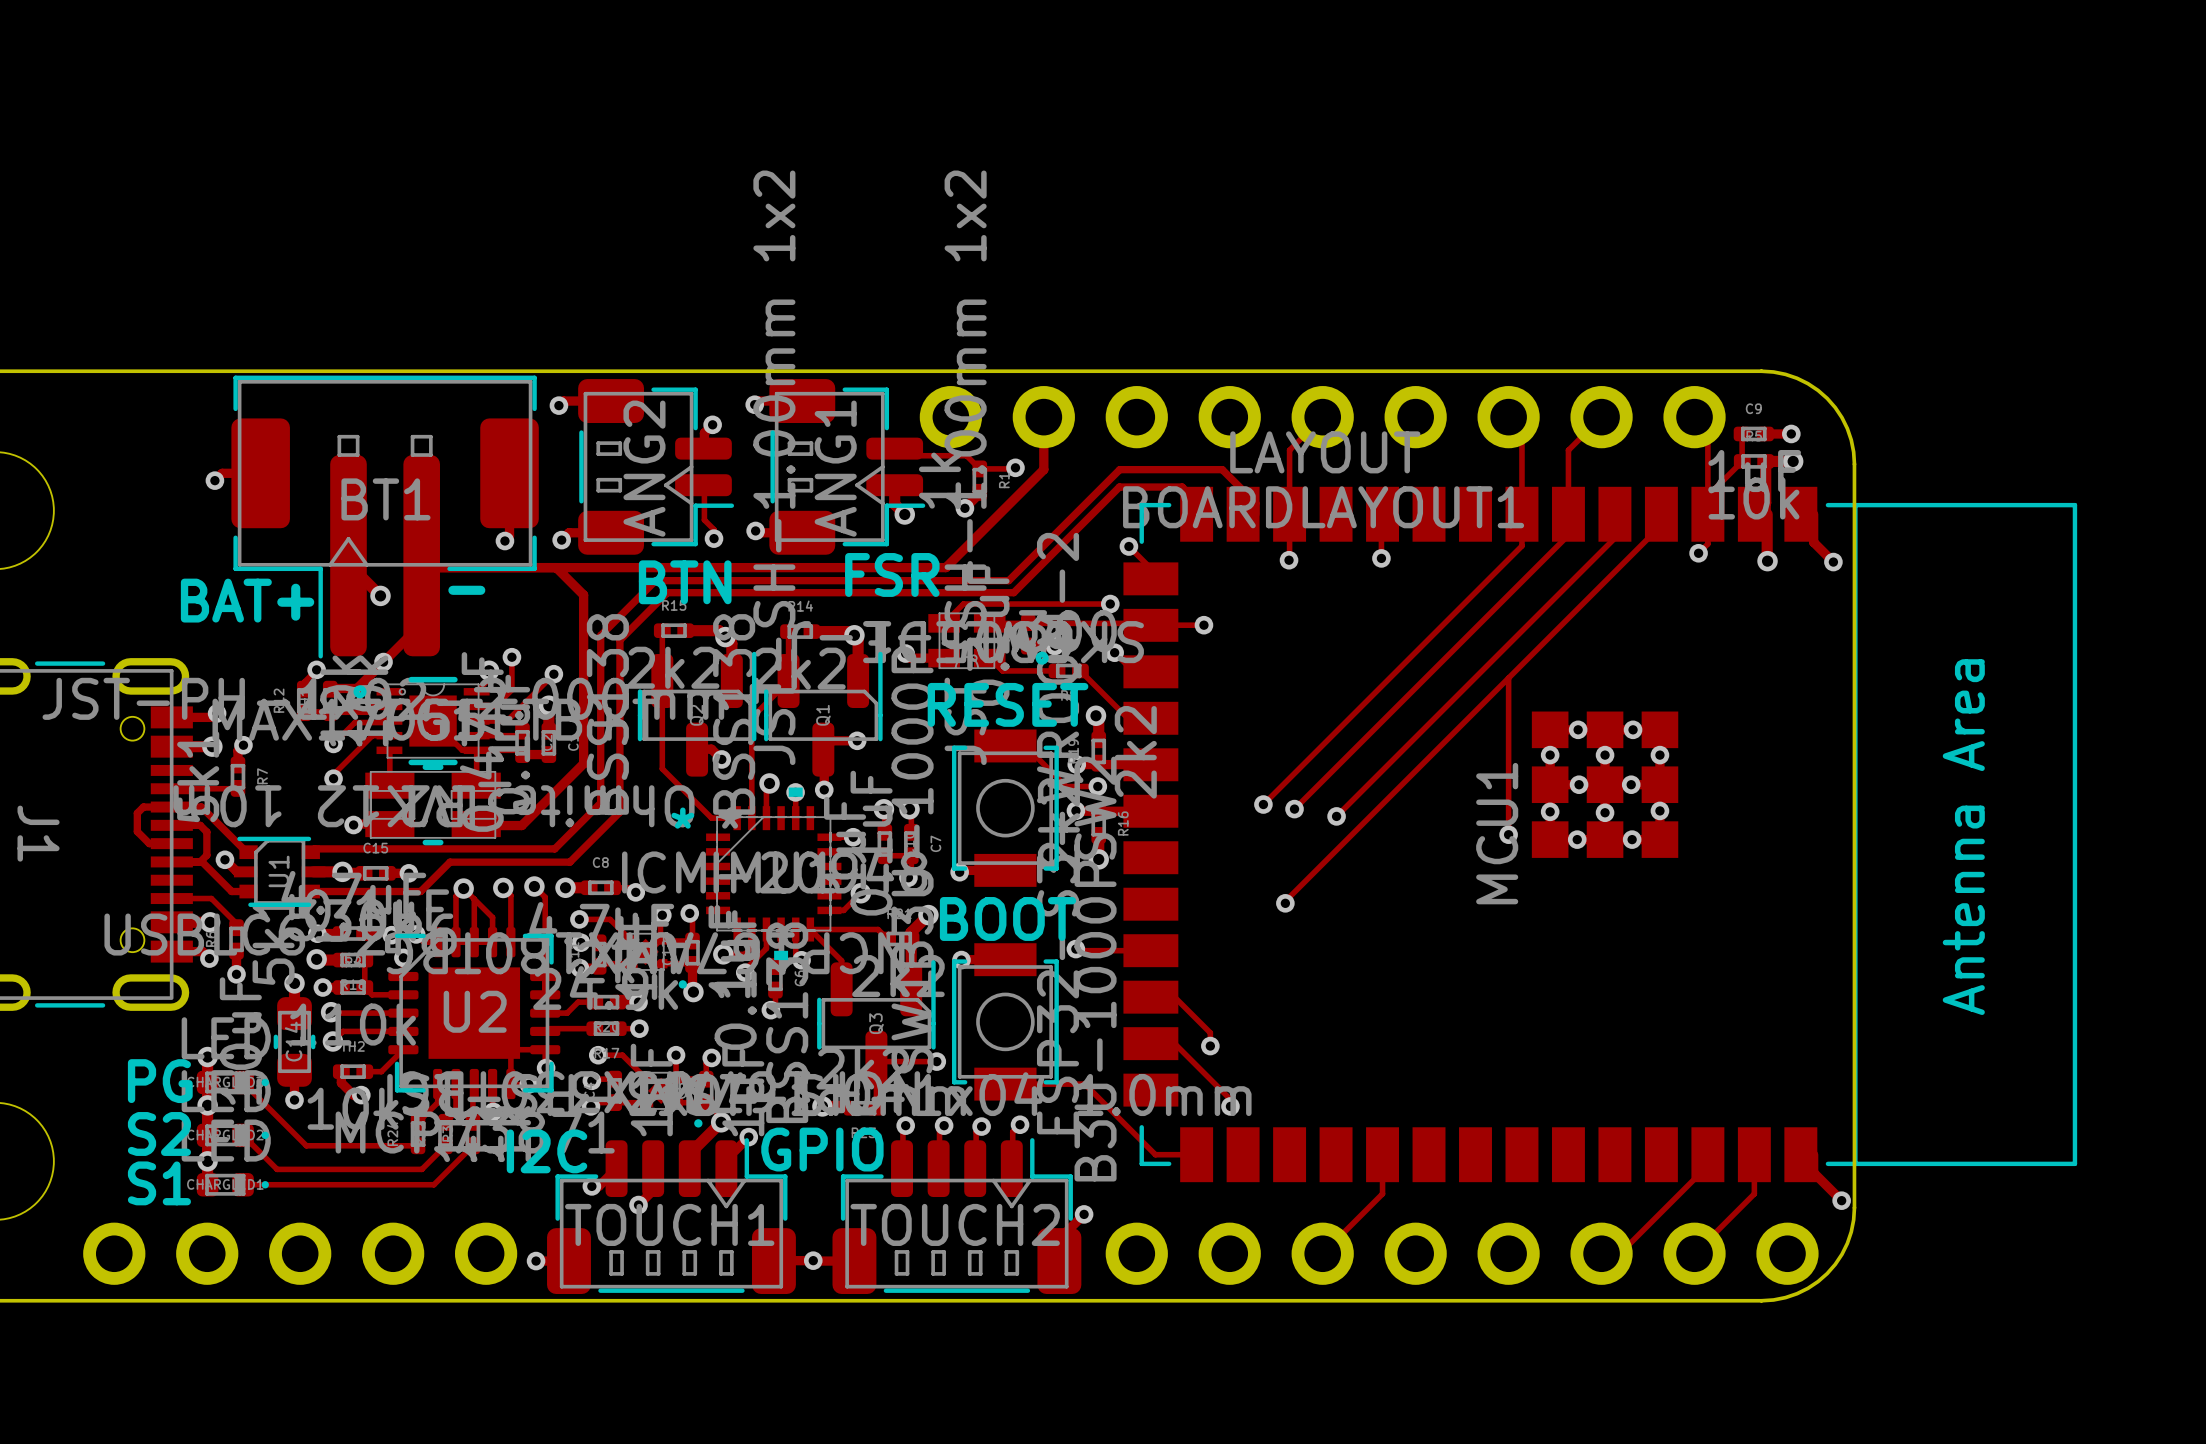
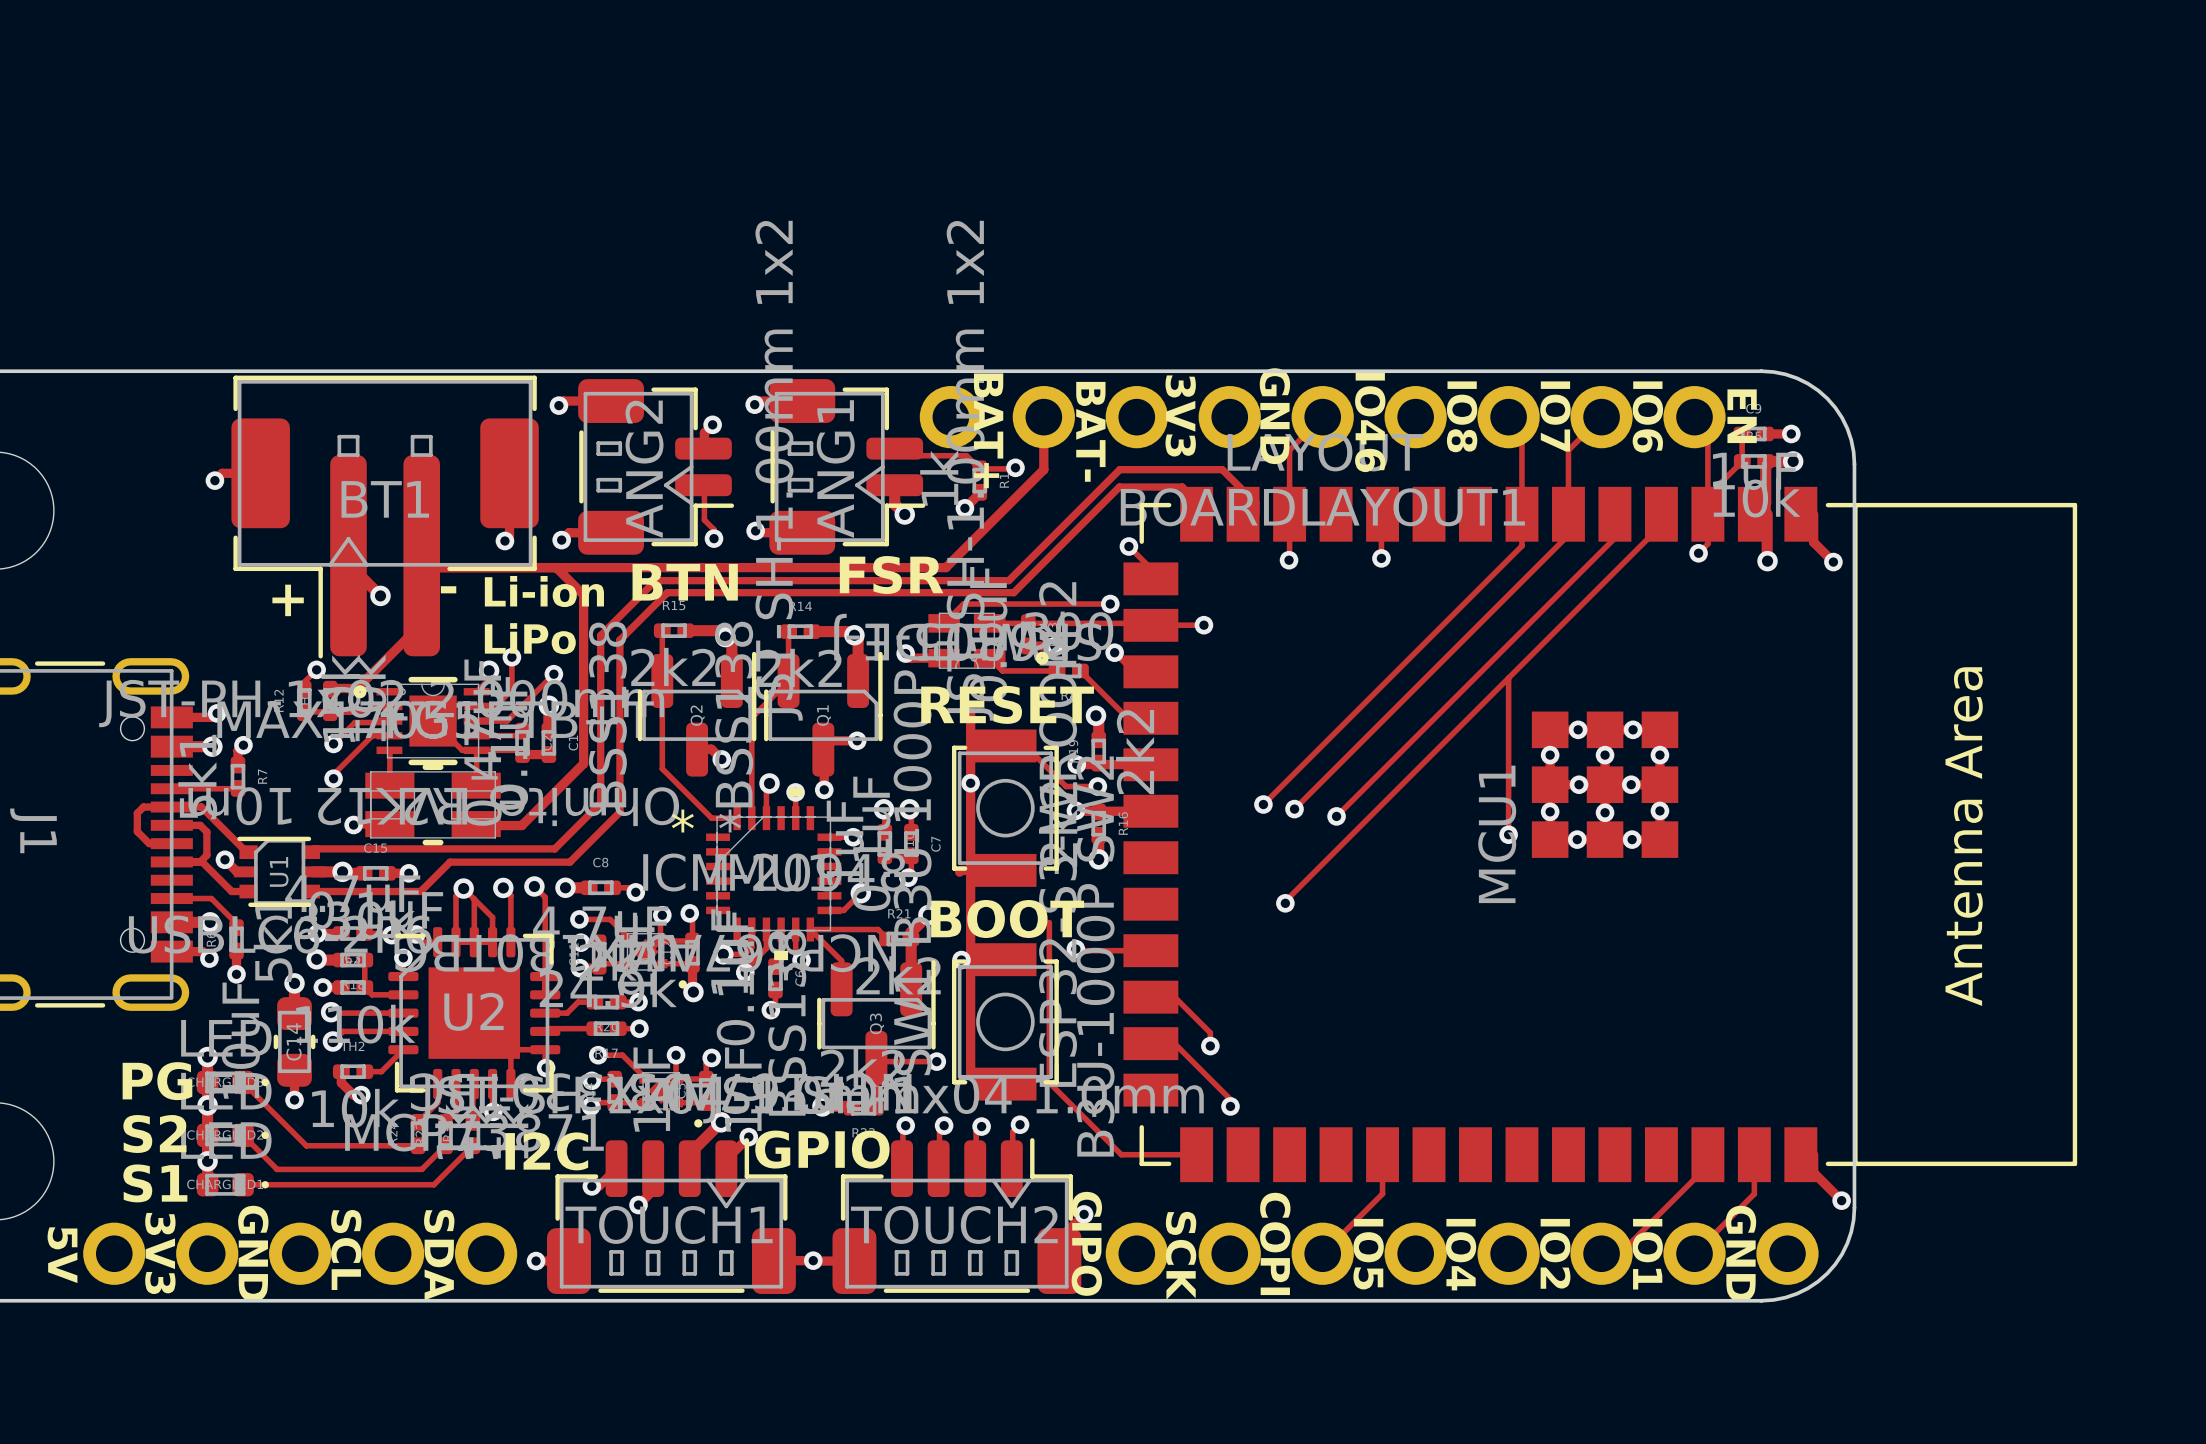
BOARDLAYOUT1 footprint: [83, 386, 1819, 1285] -> [83, 386, 1819, 1285]
text: none -> Li-ion (544, 591)
text: BAT (226, 600) -> none
text: none -> LiPo (530, 638)
via: (383, 662) -> none
track: none -> (970, 712) (970, 1074)
via position: (959, 872) -> (970, 783)
track: none -> (1049, 922) (1049, 1074)
track: (1005, 1084) (1084, 1084) (1155, 1154) -> (1049, 1082) (1121, 1154) (1155, 1154)

